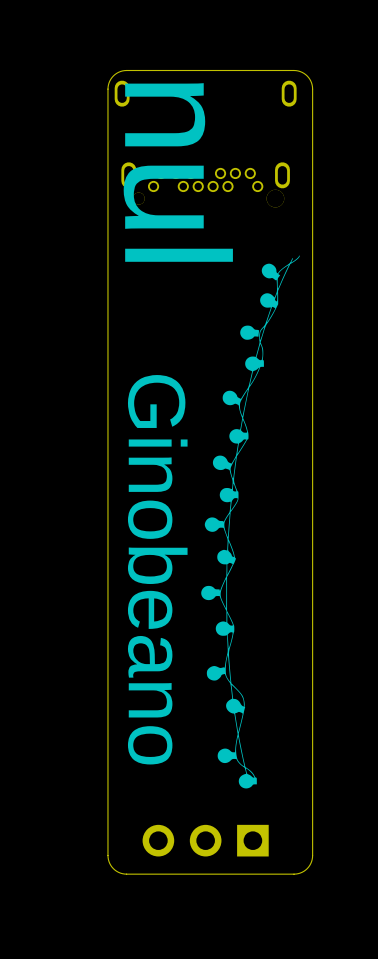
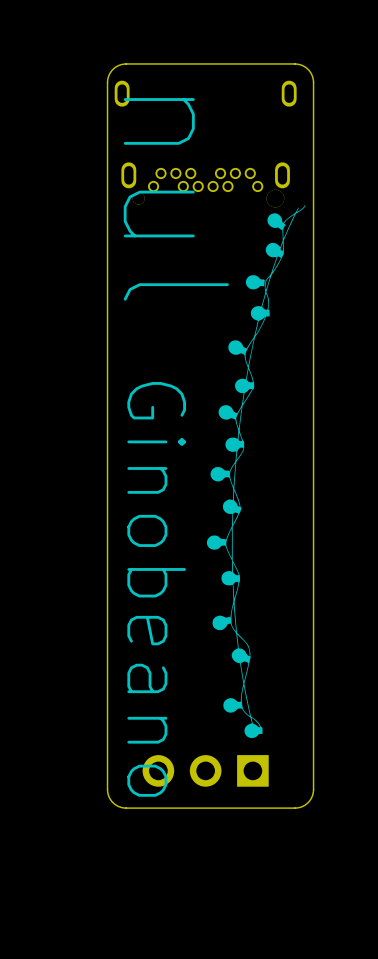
board edge: (294, 70) (124, 70) (113, 75) (108, 84) (107, 855) (112, 867) (122, 873) (296, 874) (305, 870) (312, 859) (312, 89) (307, 75) (294, 70) -> (294, 63) (308, 69) (313, 82) (313, 793) (306, 804) (297, 807) (121, 807) (111, 801) (107, 789) (107, 78) (112, 69) (124, 64) (294, 63)
drawing position: (249, 332) -> (255, 282)
drawing position: (250, 522) -> (256, 471)
part position: (205, 840) -> (205, 770)

